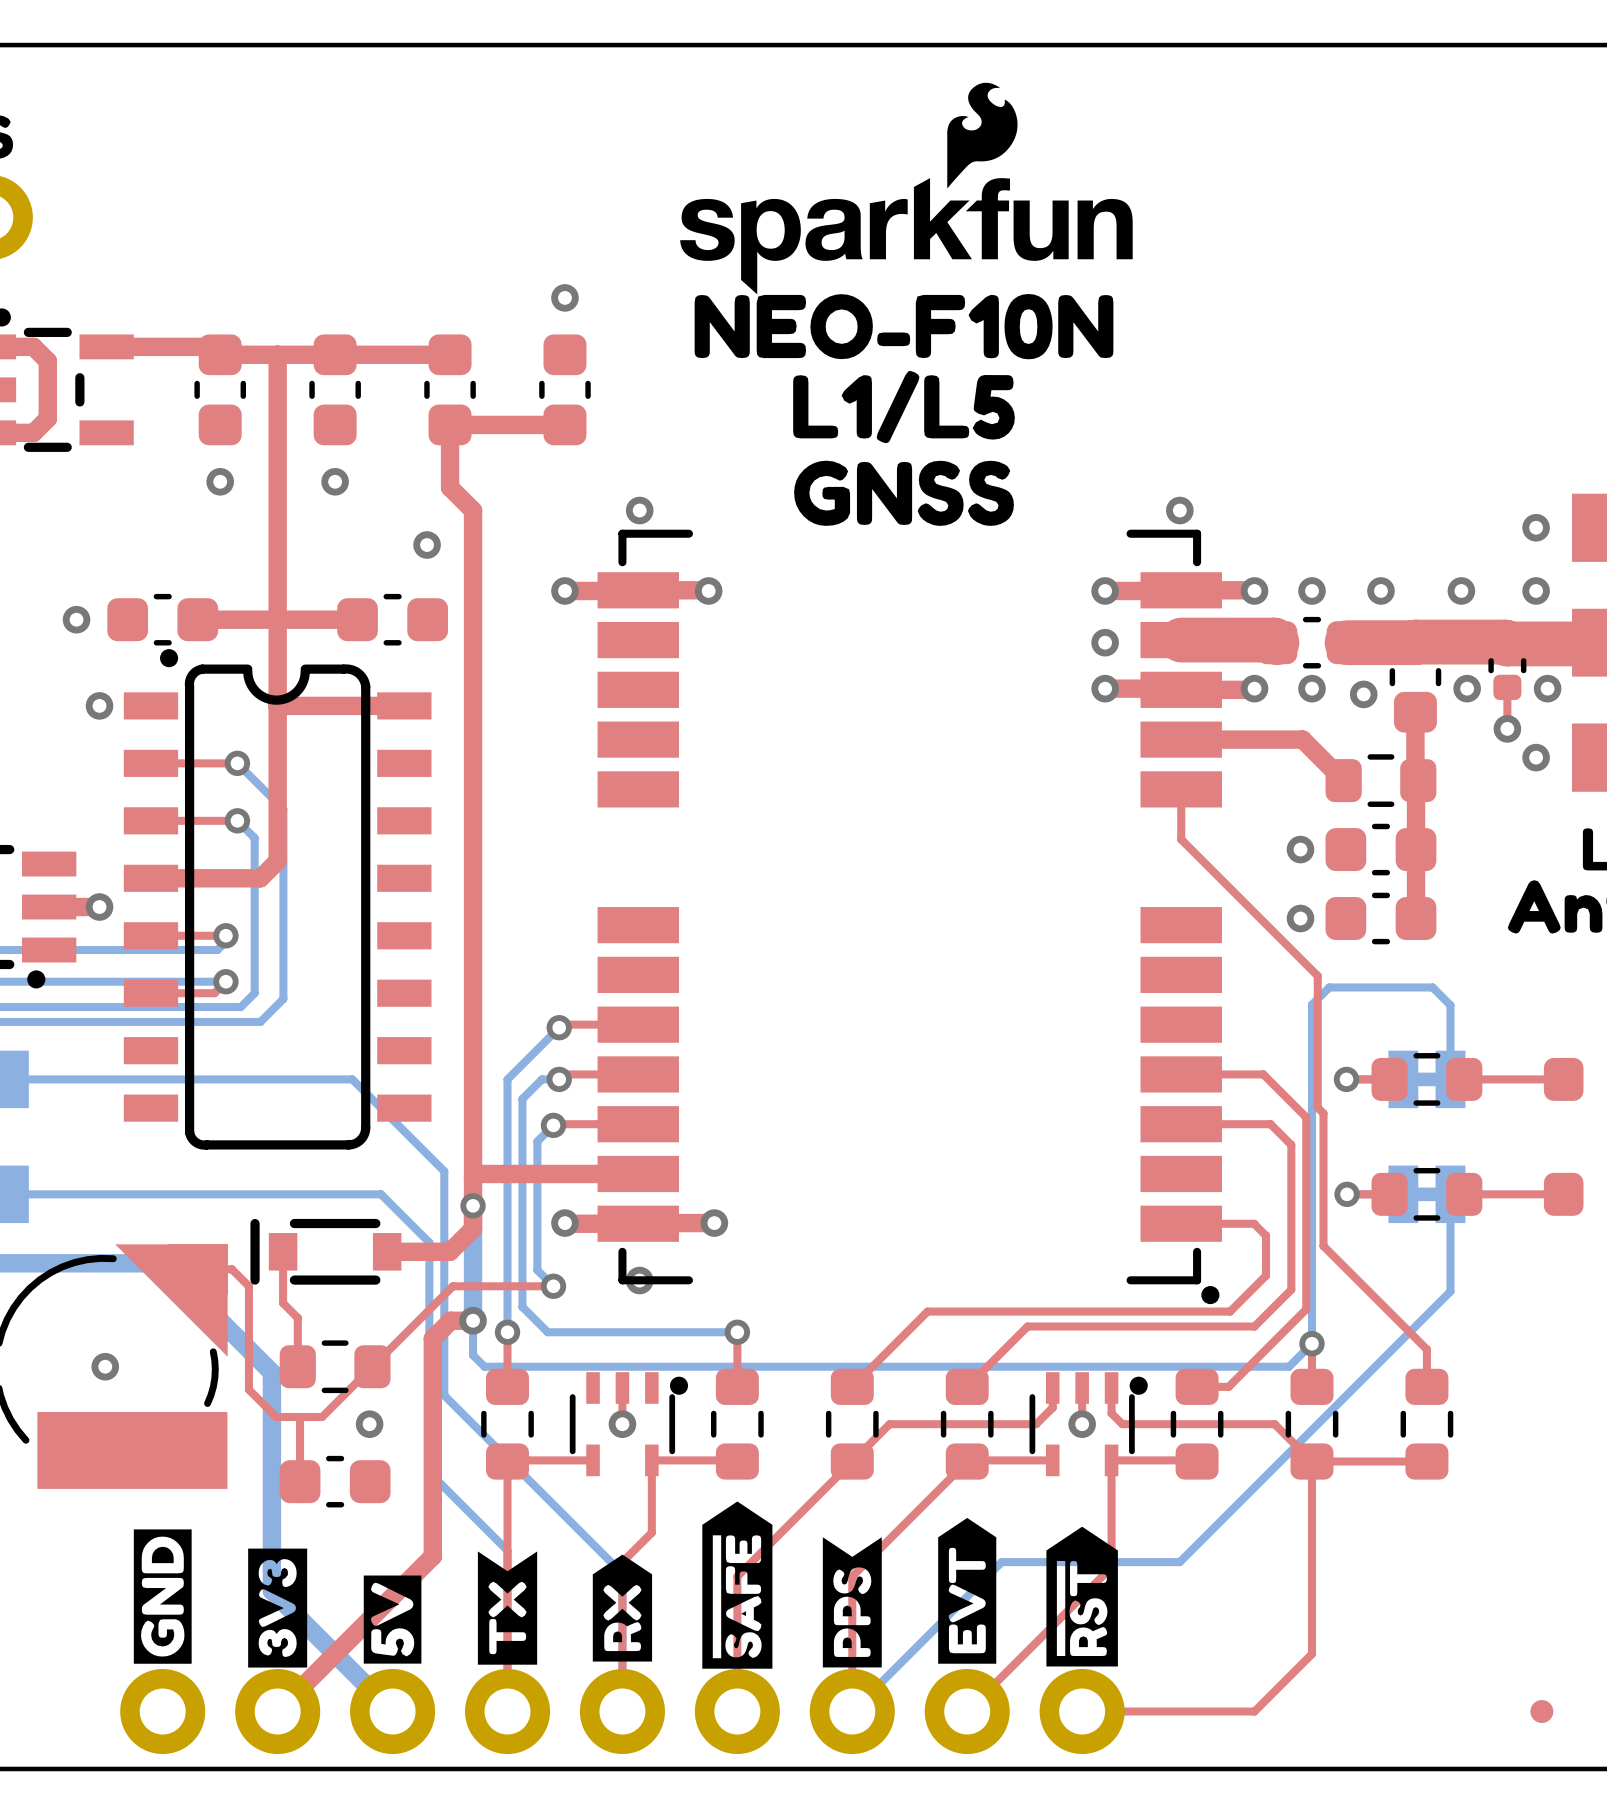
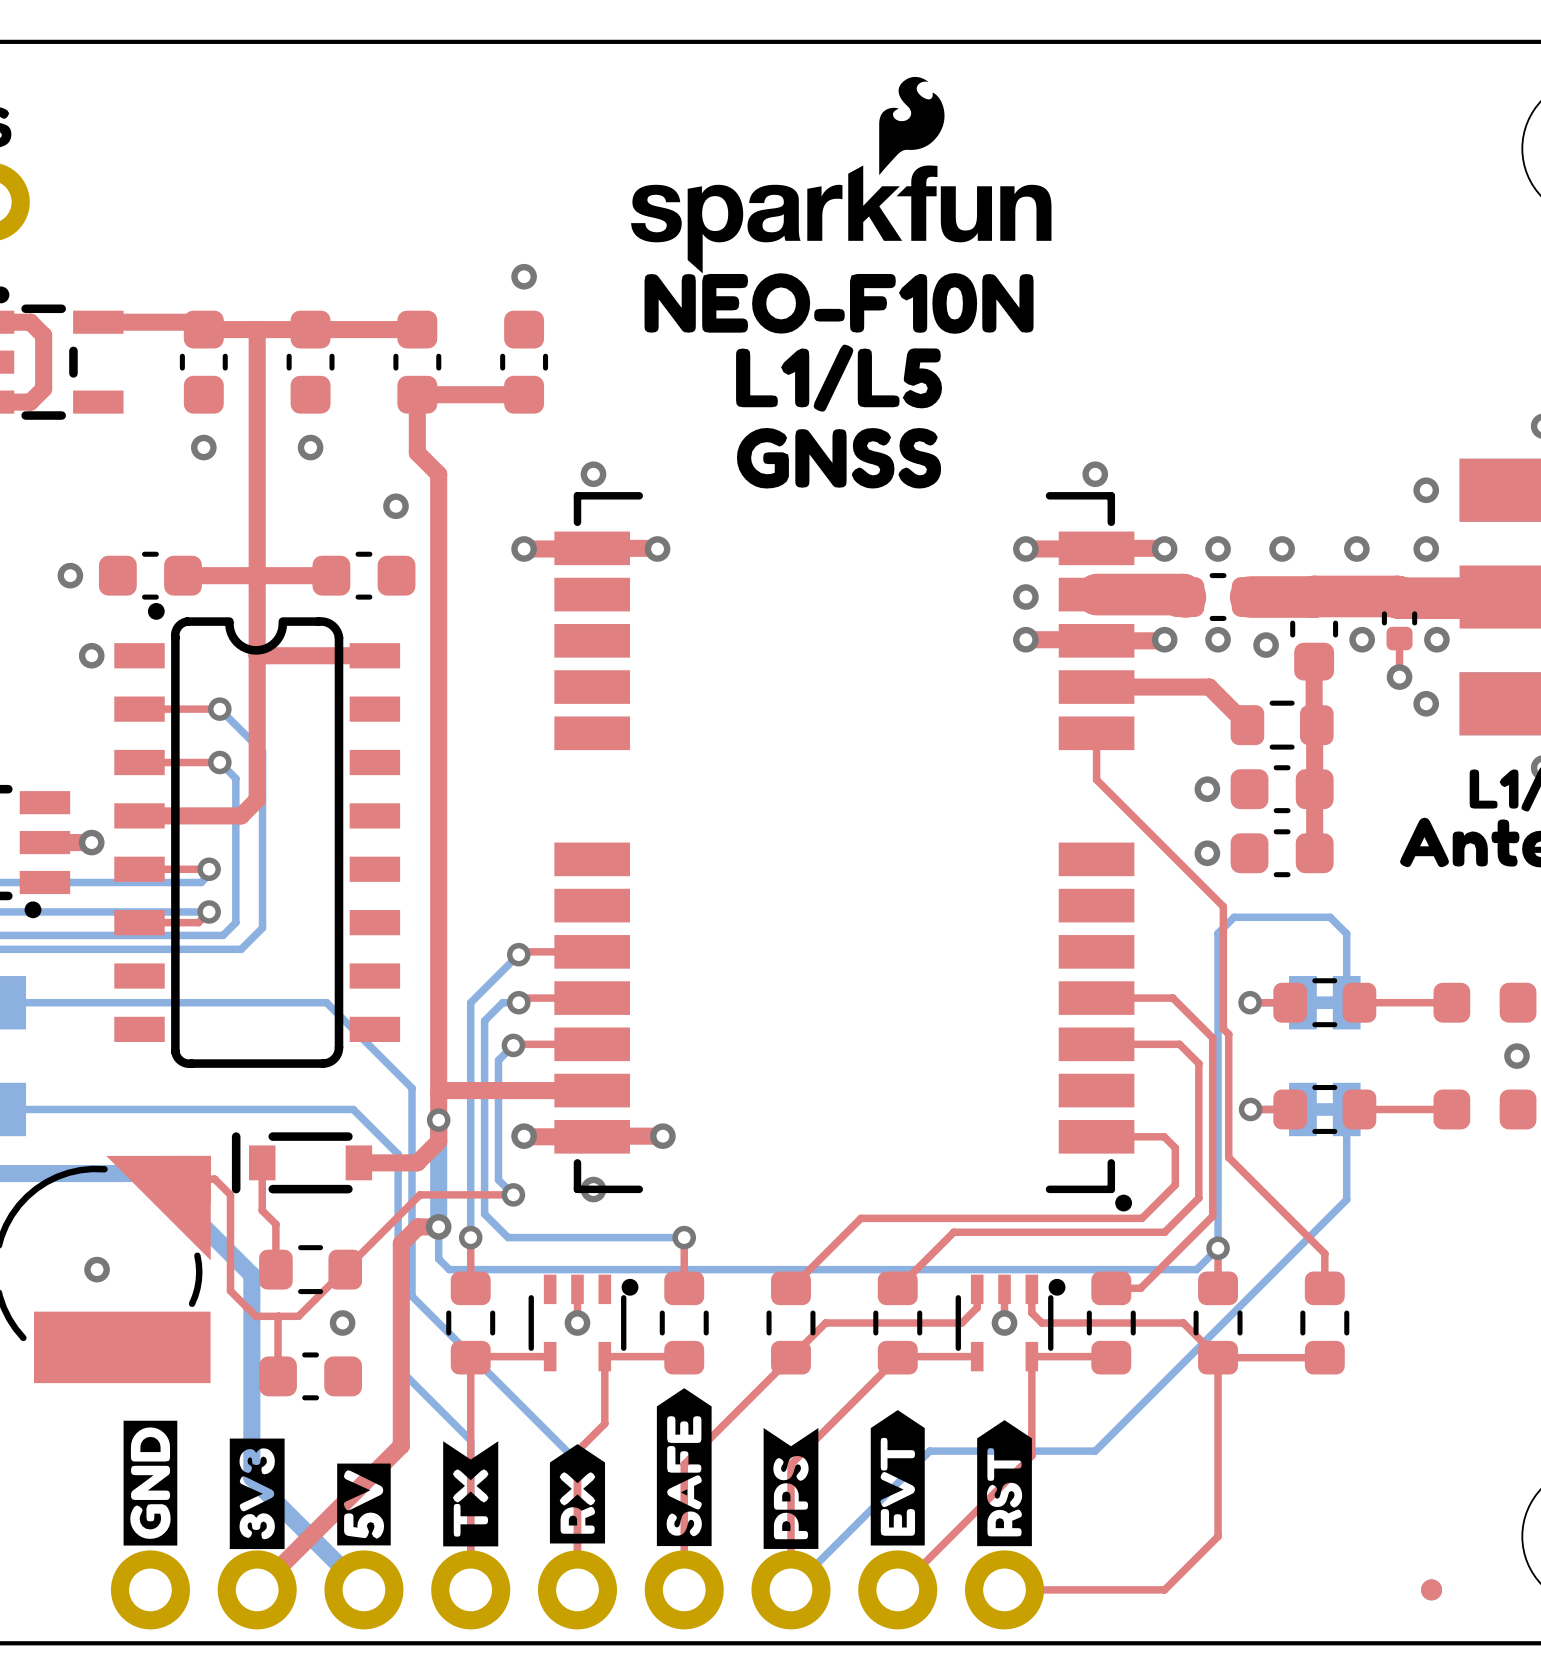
drawing shape: [702, 1501, 773, 1669] -> [656, 1388, 712, 1547]
drawing shape: [1046, 1526, 1118, 1667] -> [977, 1420, 1032, 1547]

